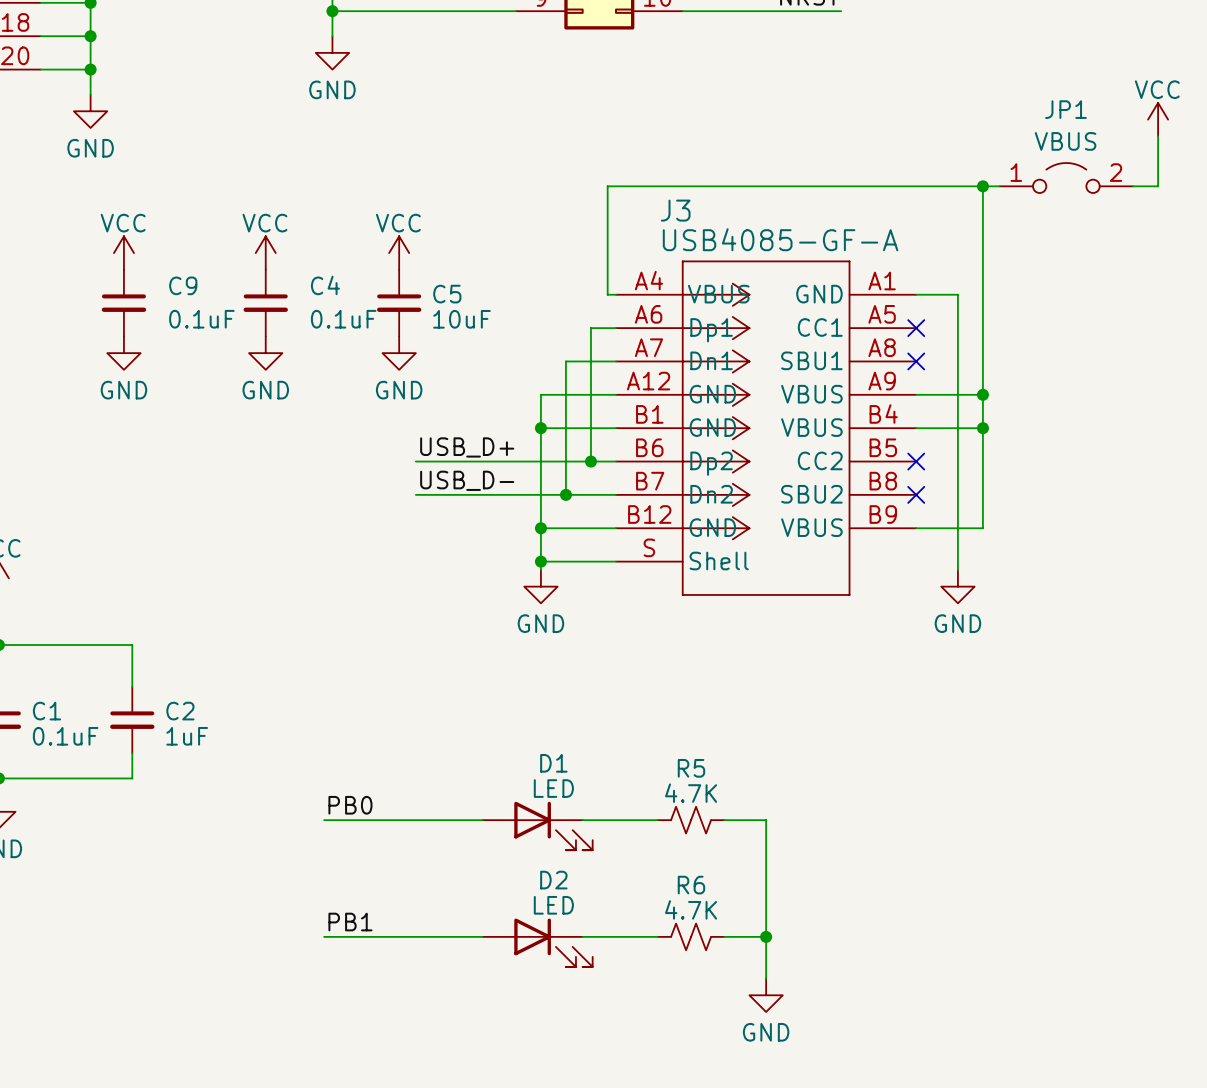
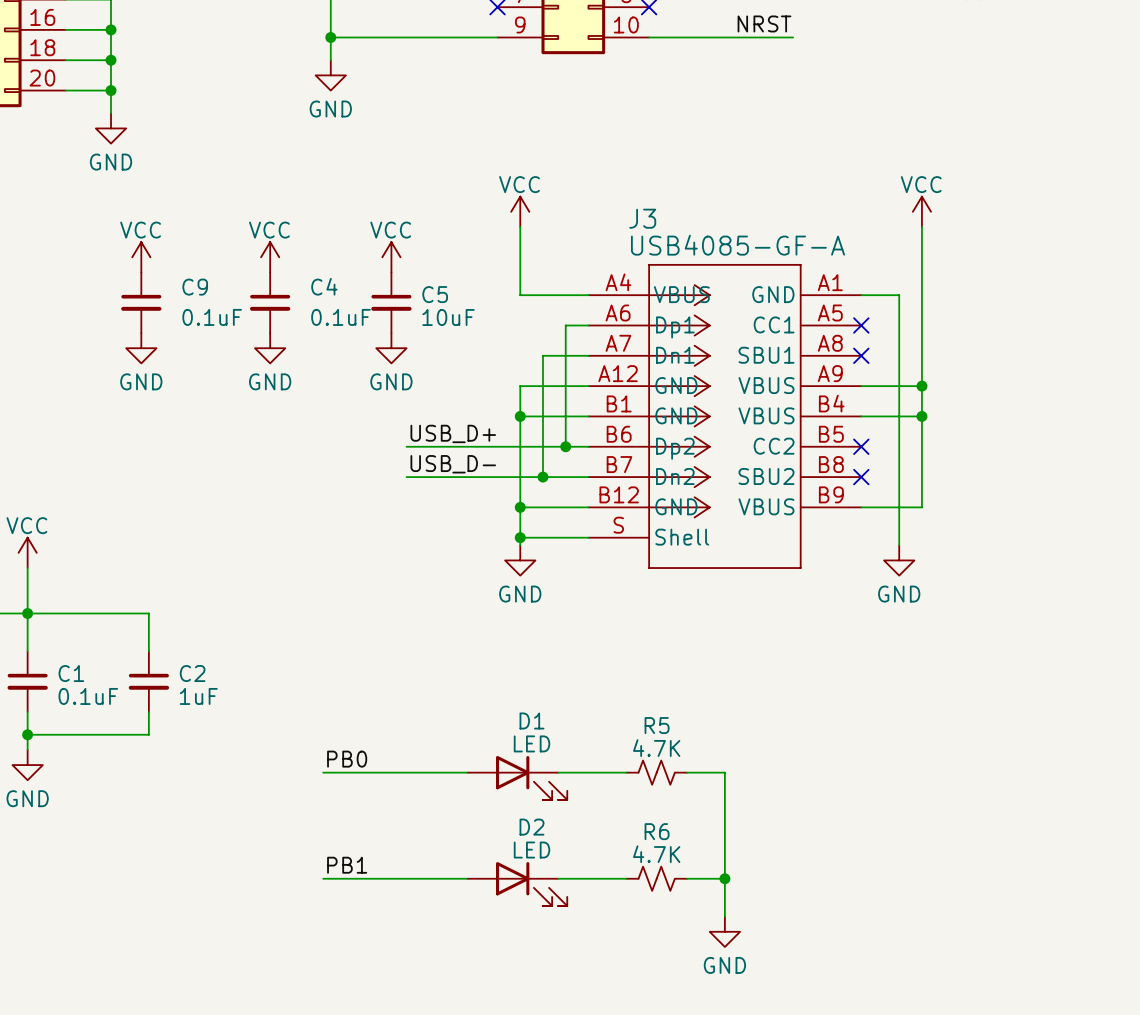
power symbol position: VCC (1158, 119) -> VCC (921, 211)
wire: (1158, 136) (1158, 186) (1133, 186) -> none
JP1: VBUS (1066, 177) -> none
junction: (982, 186) -> none
wire: (999, 186) (607, 186) (607, 294) -> (520, 226) (520, 295) (580, 295)
power symbol: none -> VCC (520, 211)

